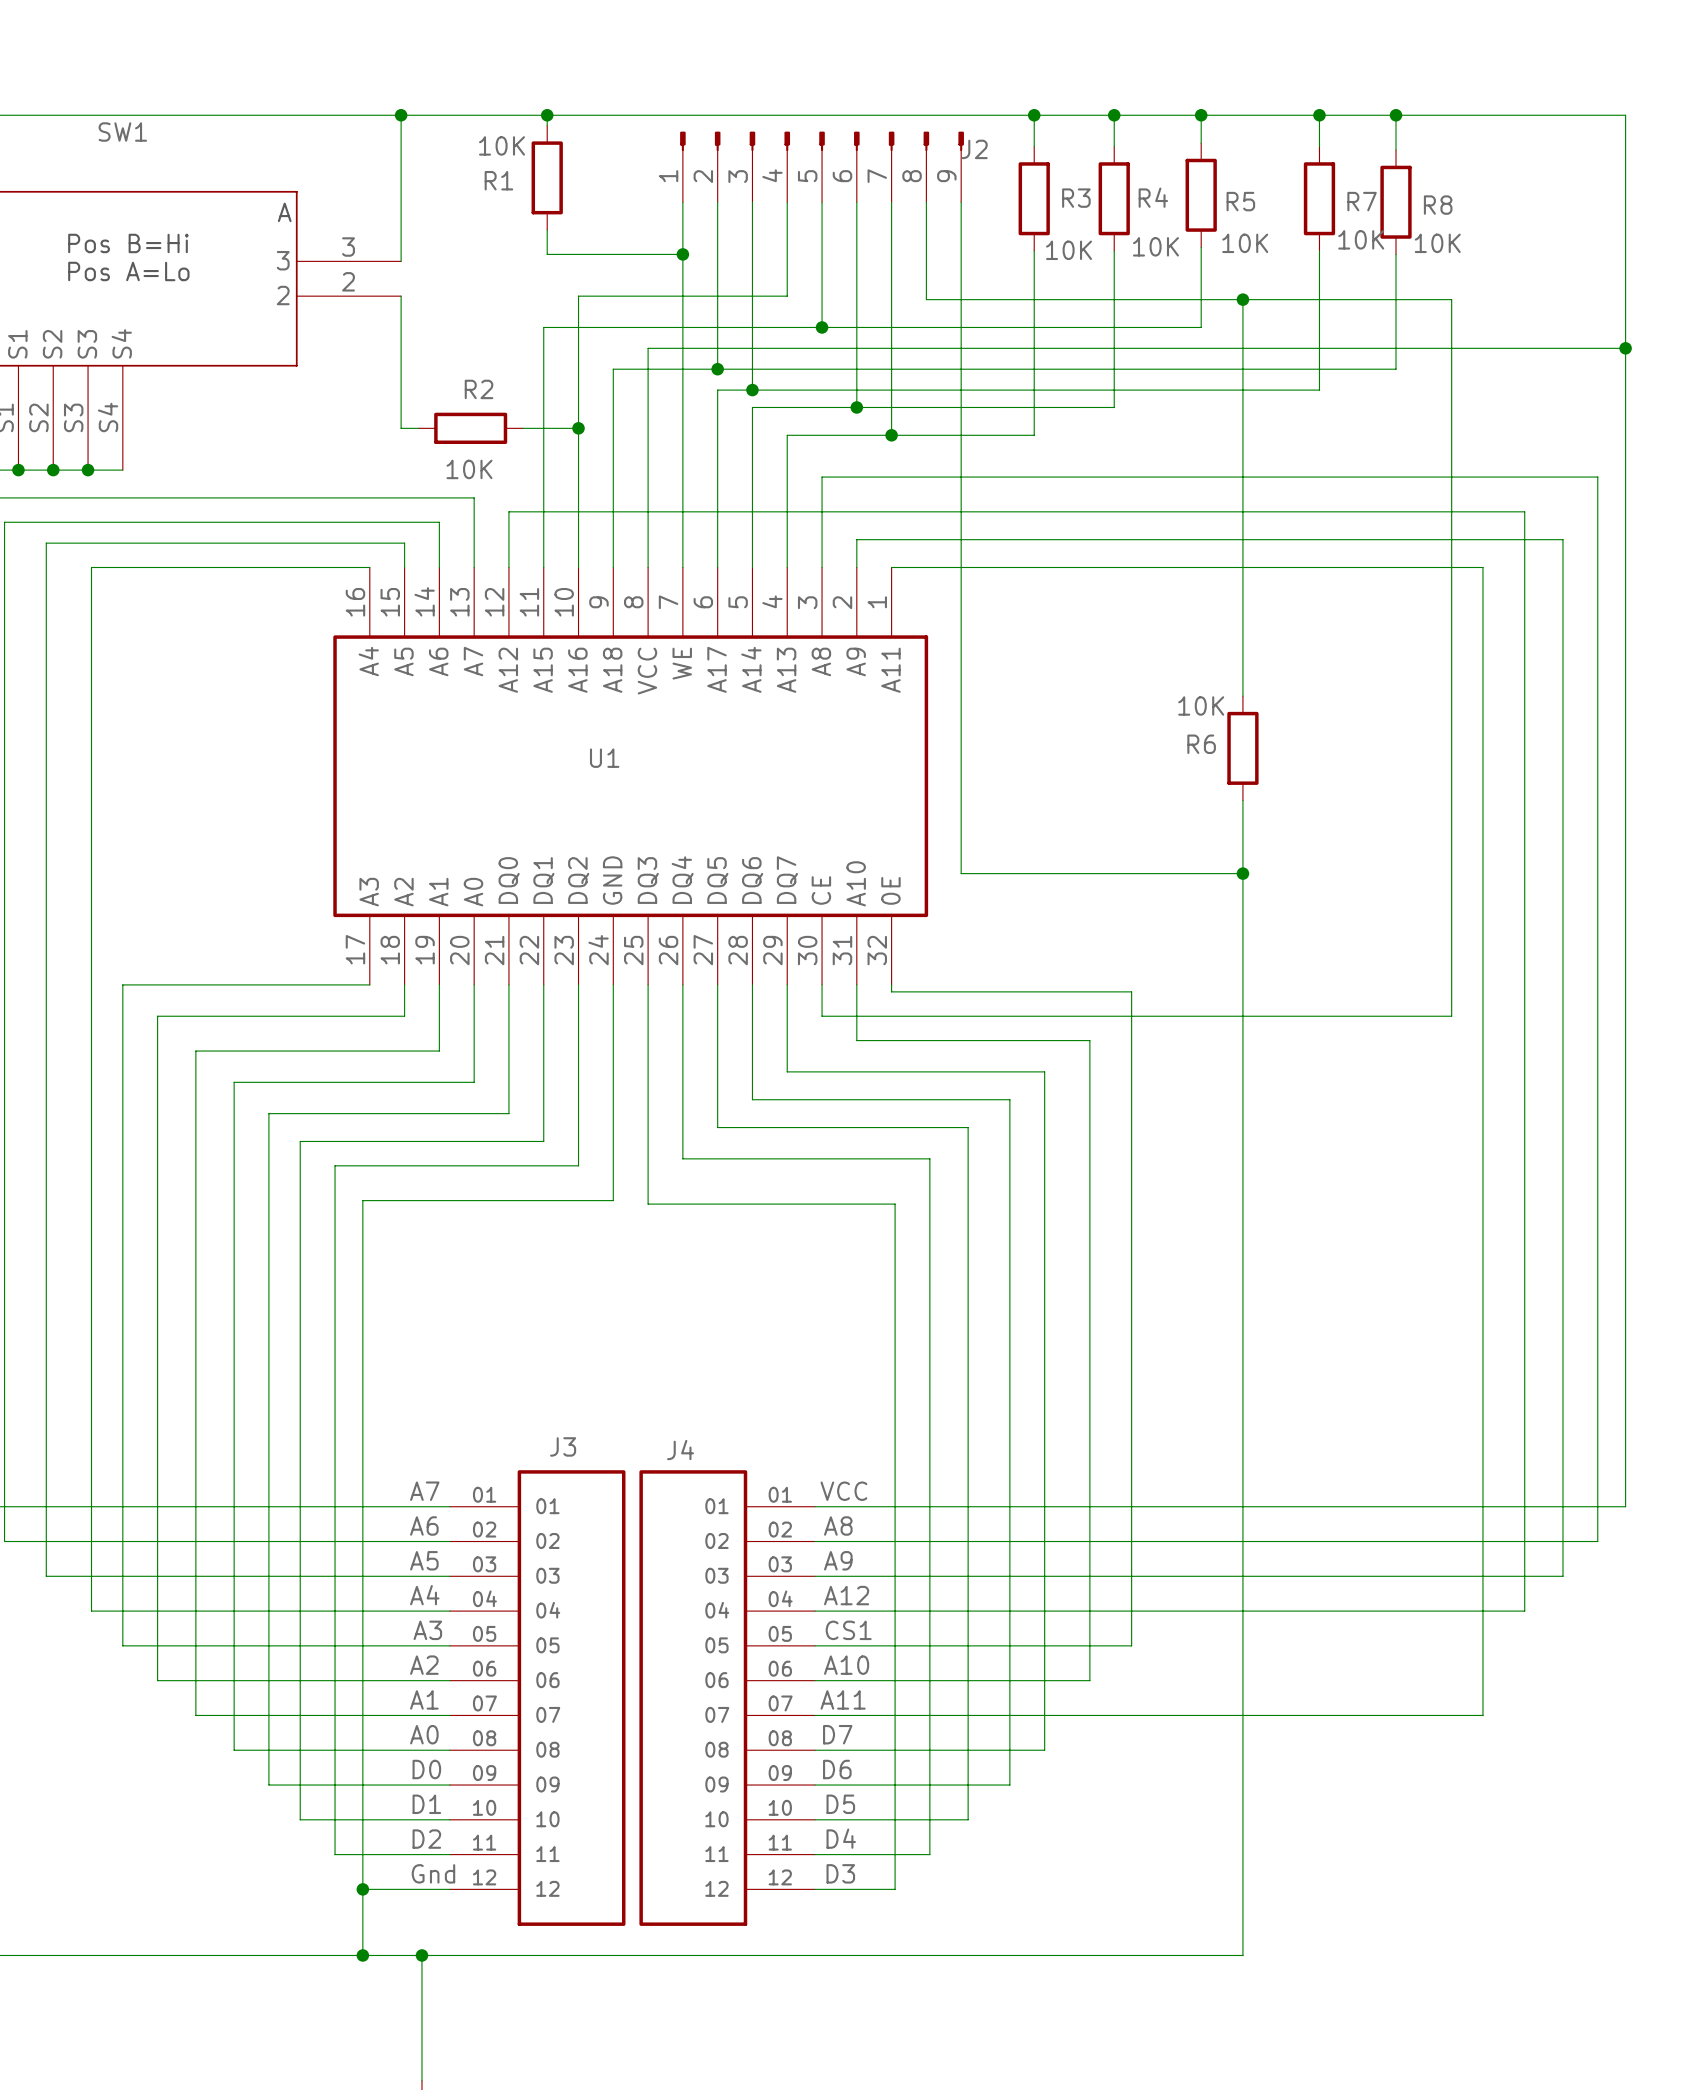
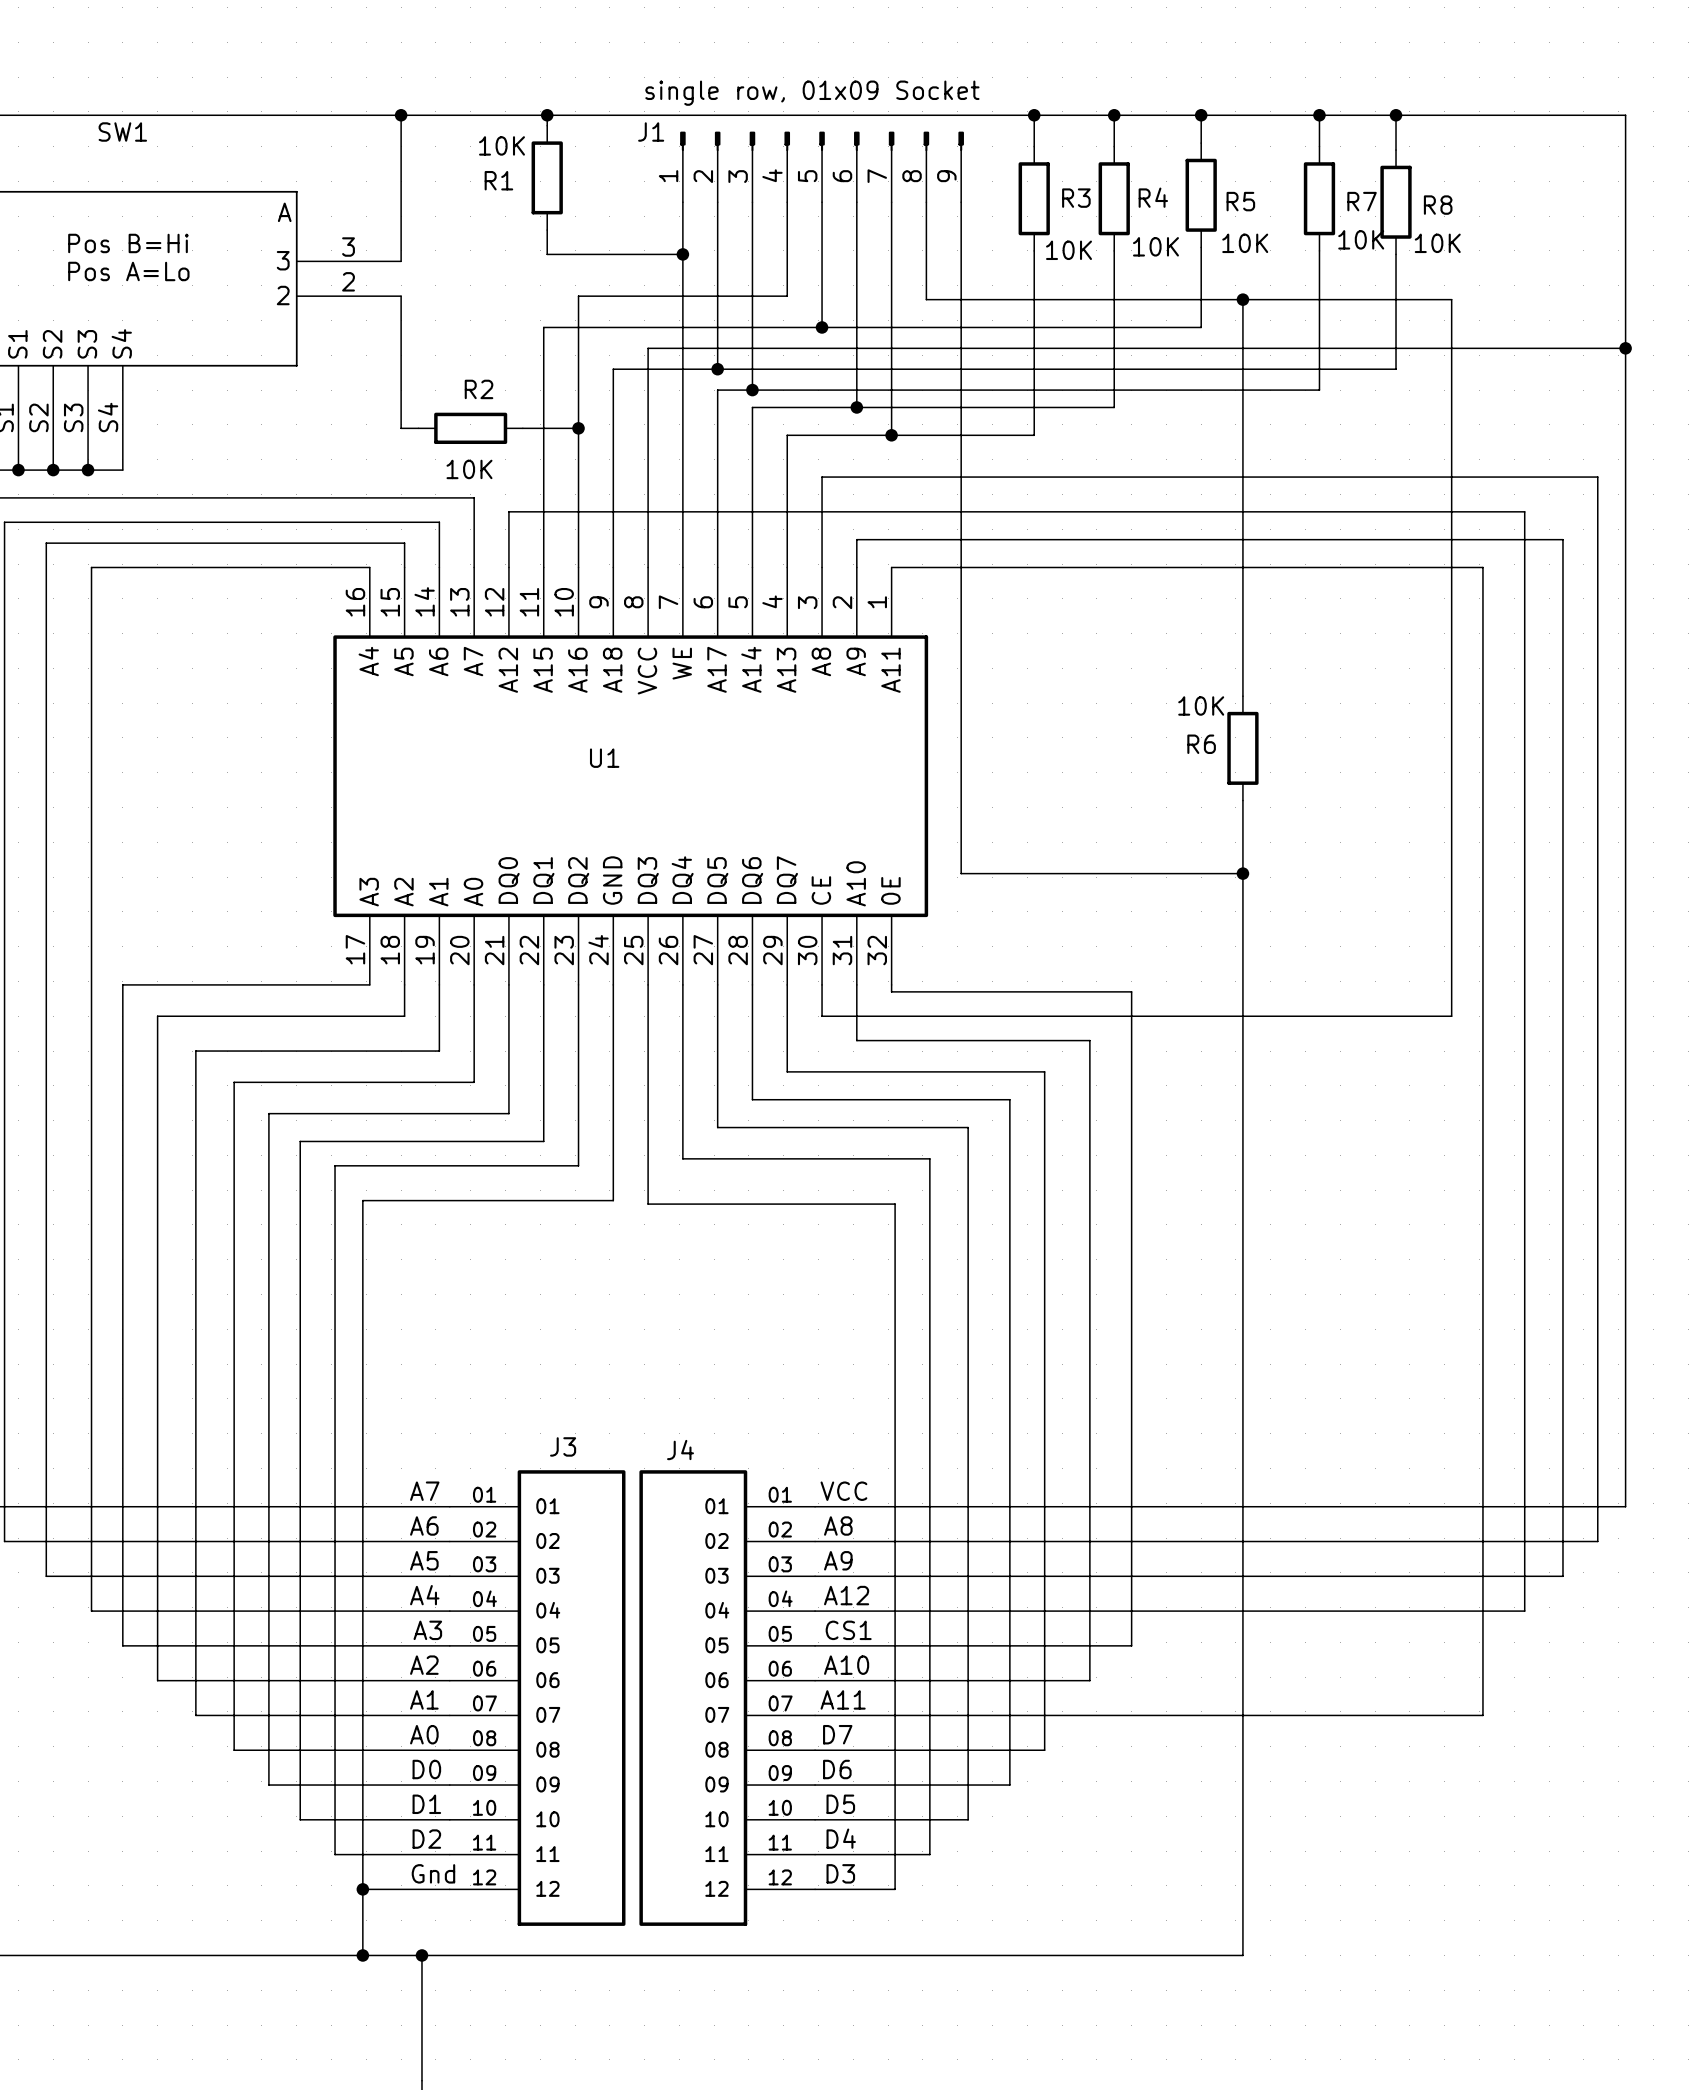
J2 text: none -> single row, 01x09 Socket (812, 93)
J2 name: J2 (974, 149) -> J1 (651, 132)

